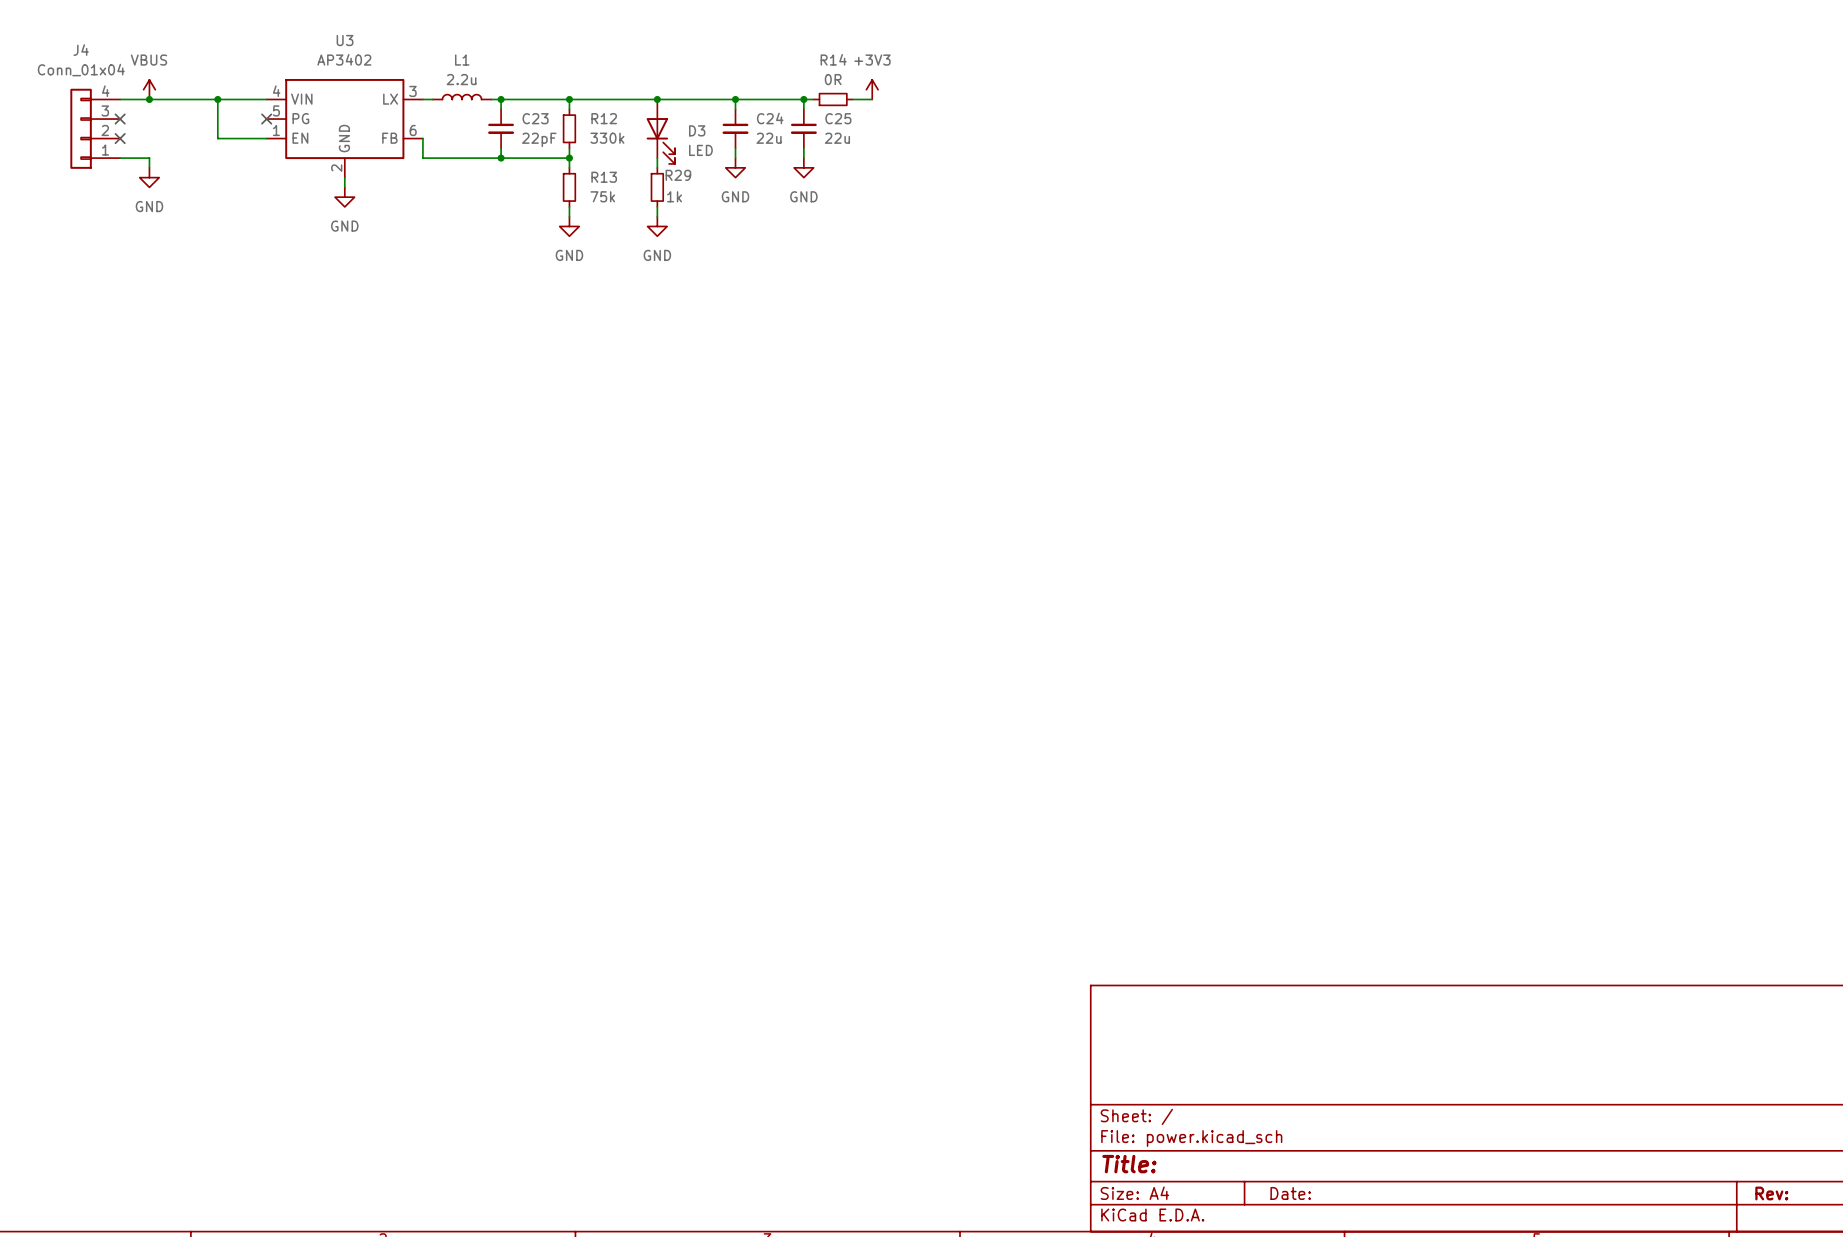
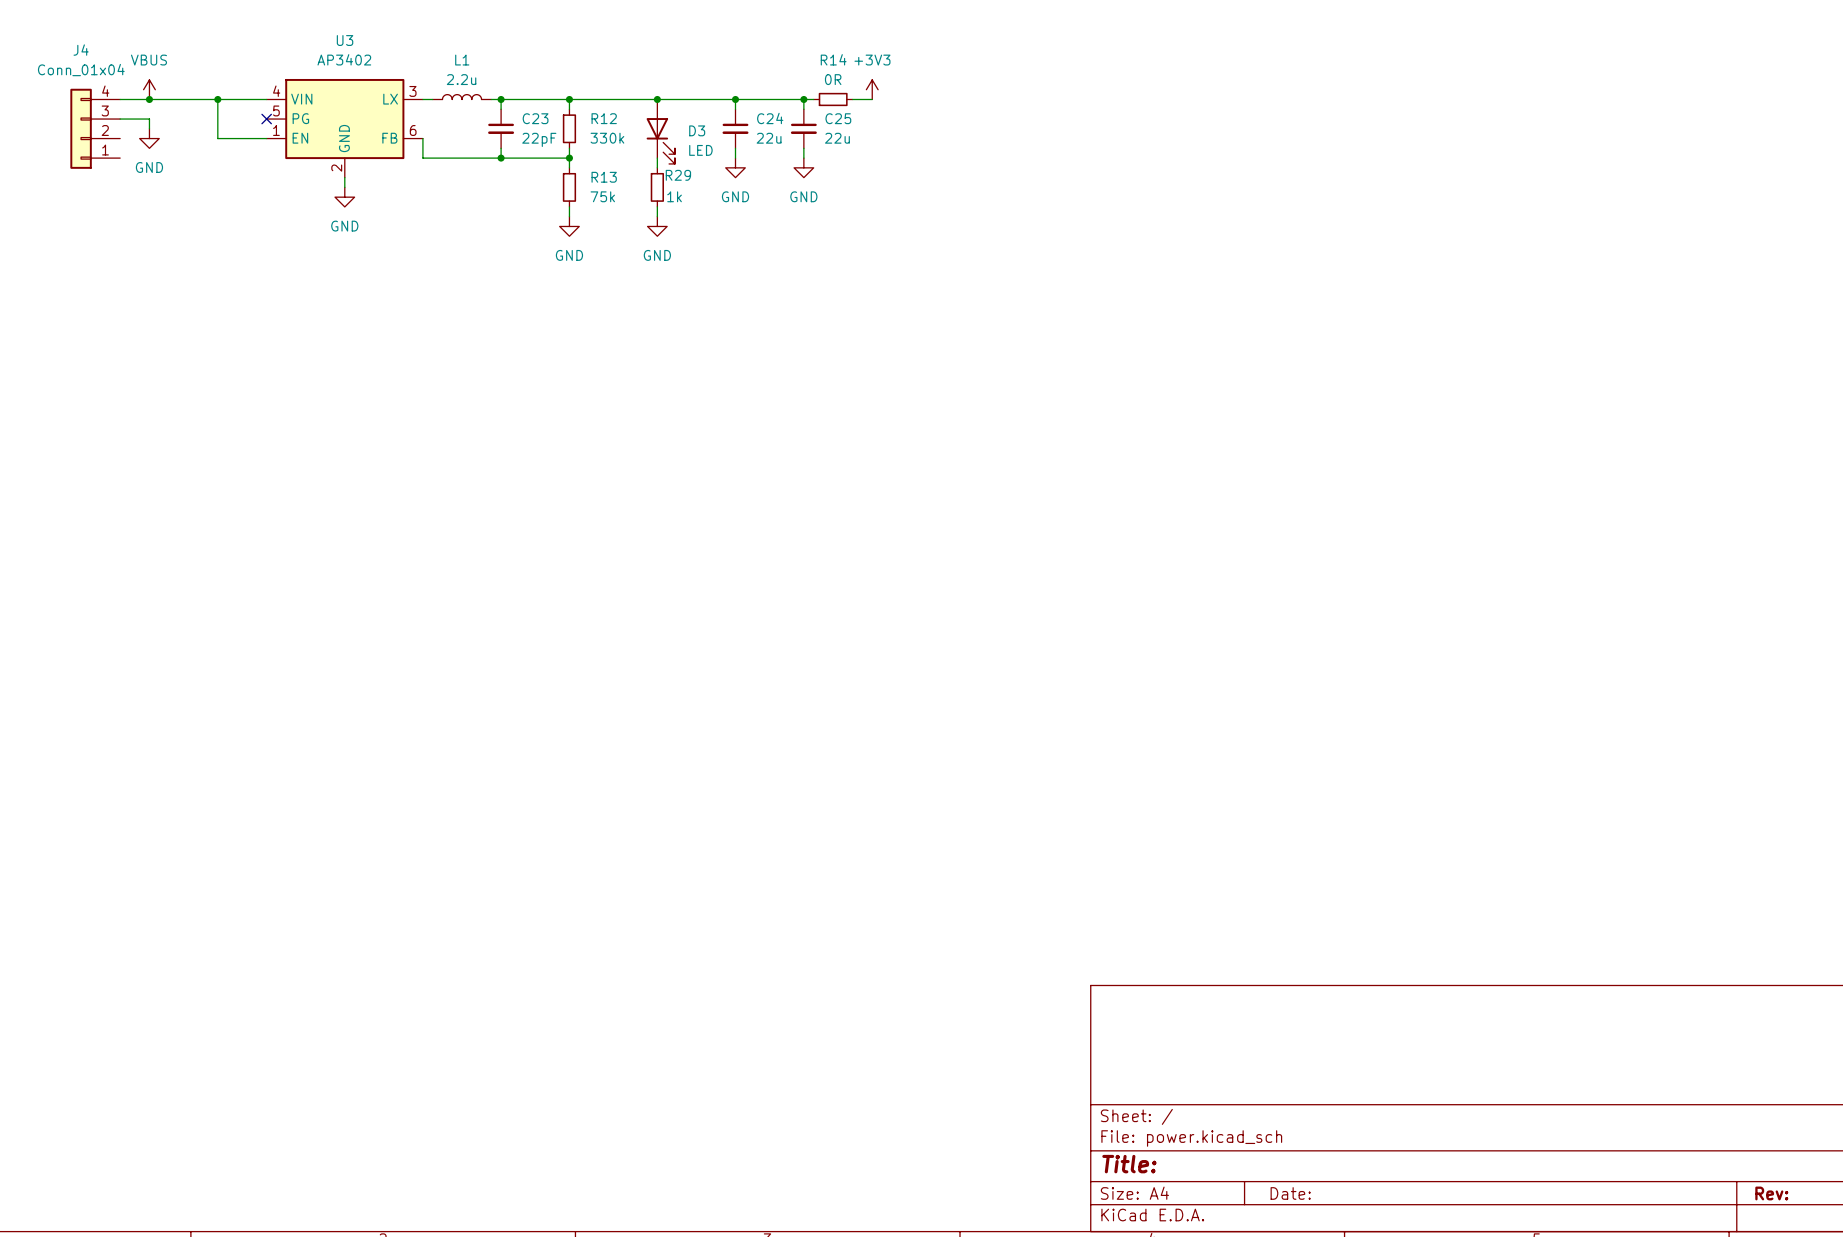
no-connect mark: (120, 119) -> none
no-connect mark: (120, 138) -> none
wire: (120, 158) (149, 158) (149, 167) -> (120, 119) (149, 119) (149, 128)
power symbol position: GND (149, 177) -> GND (149, 138)

